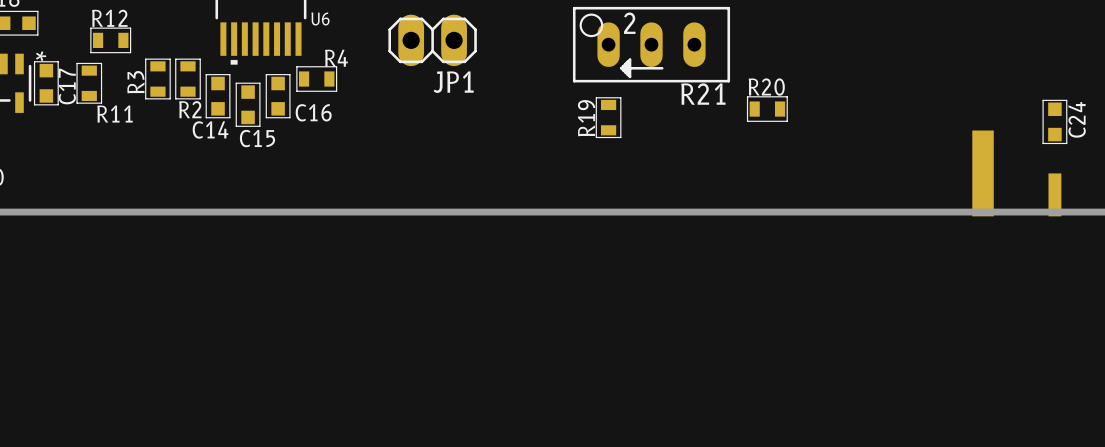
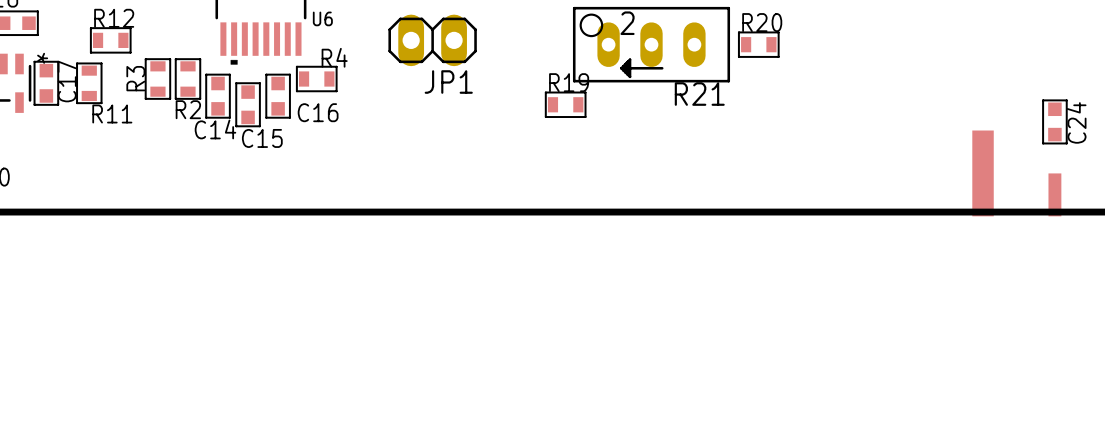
R20 position: (767, 109) -> (758, 44)
R19 rotation: 0° (608, 117) -> 90° clockwise (565, 104)
R19 position: (608, 117) -> (565, 104)

